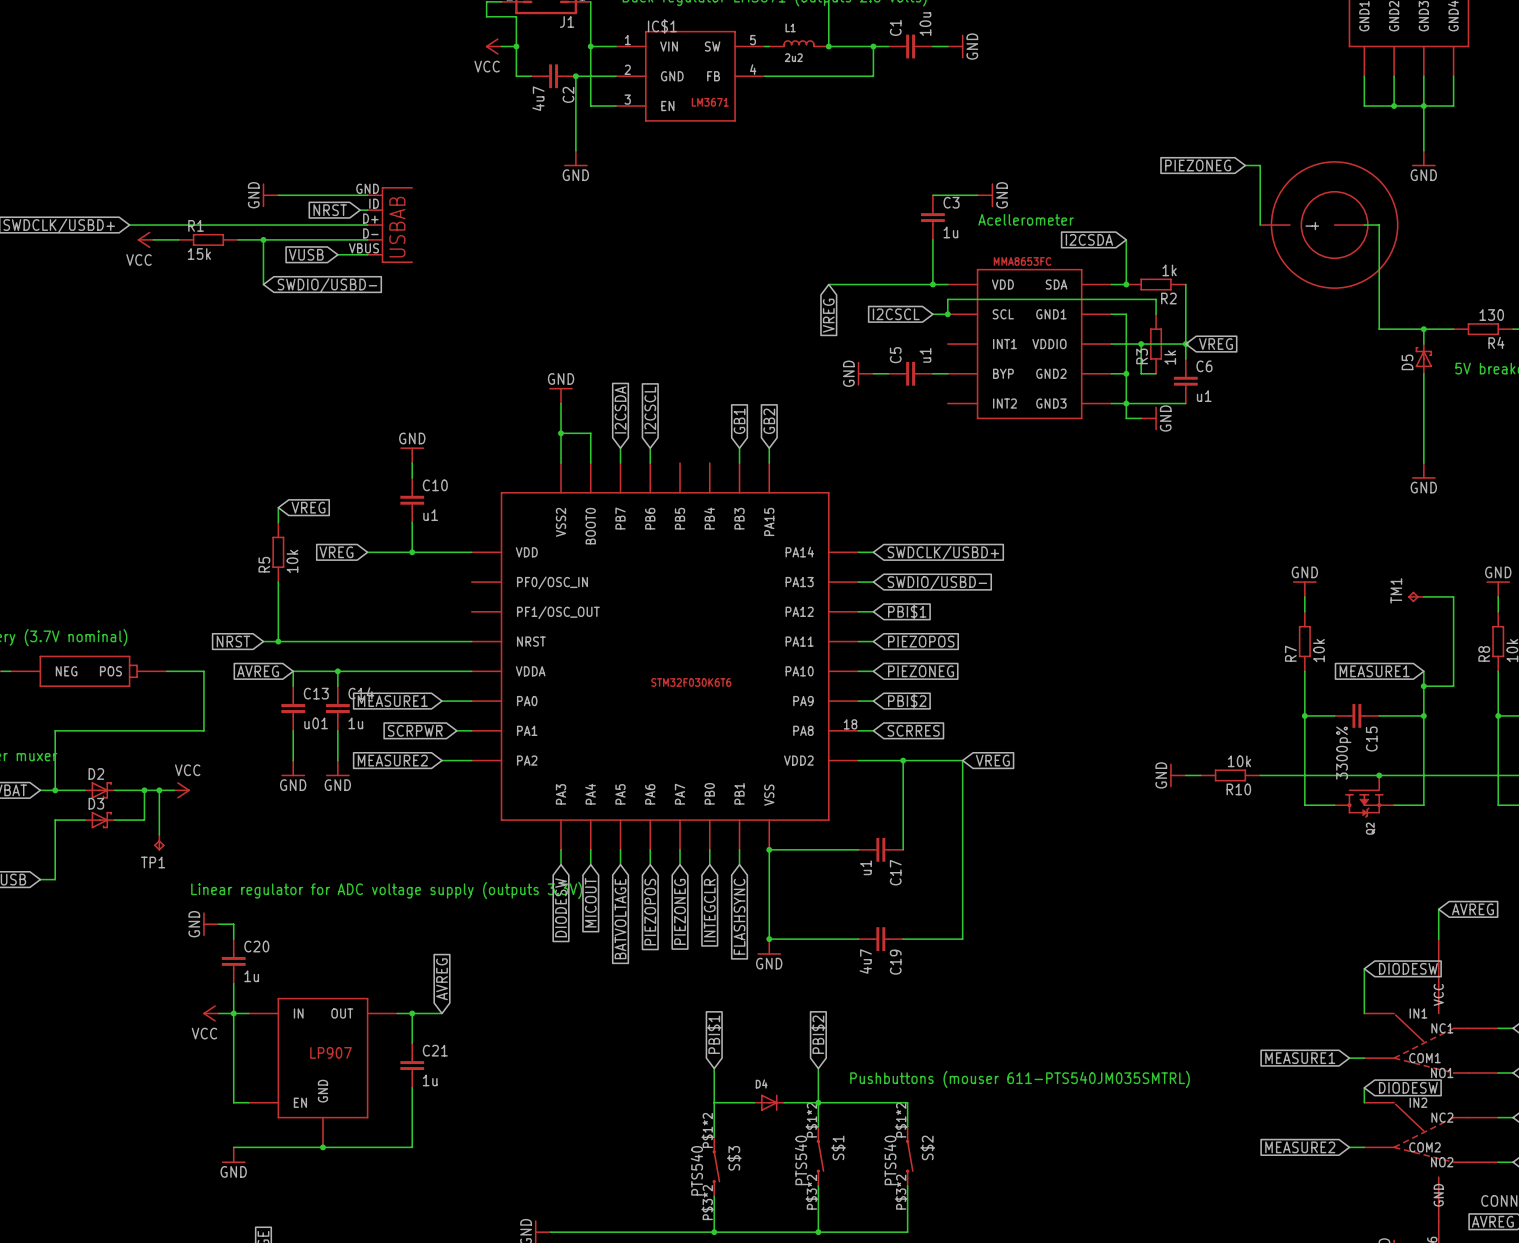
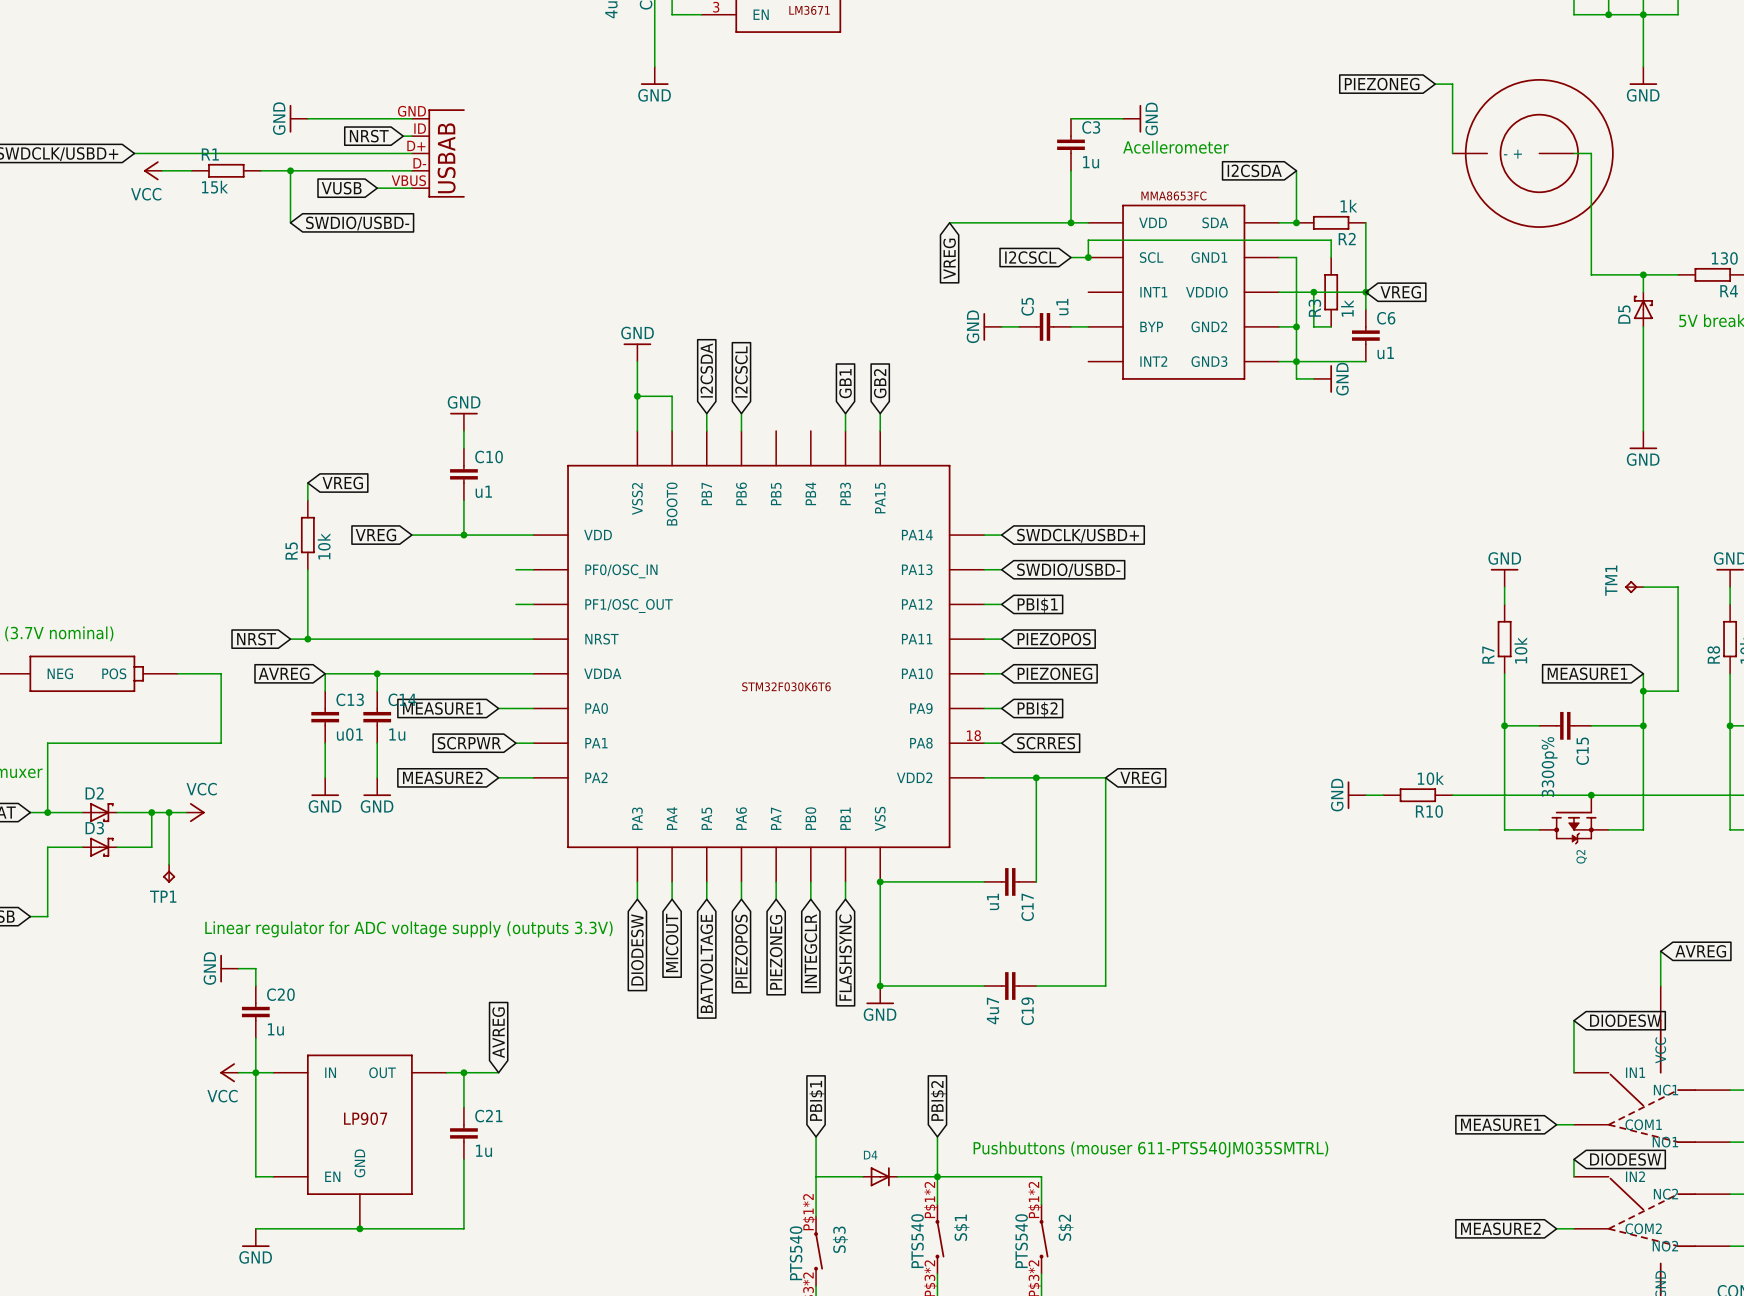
wire: none -> (515, 569) (533, 569)
wire: none -> (515, 604) (533, 604)

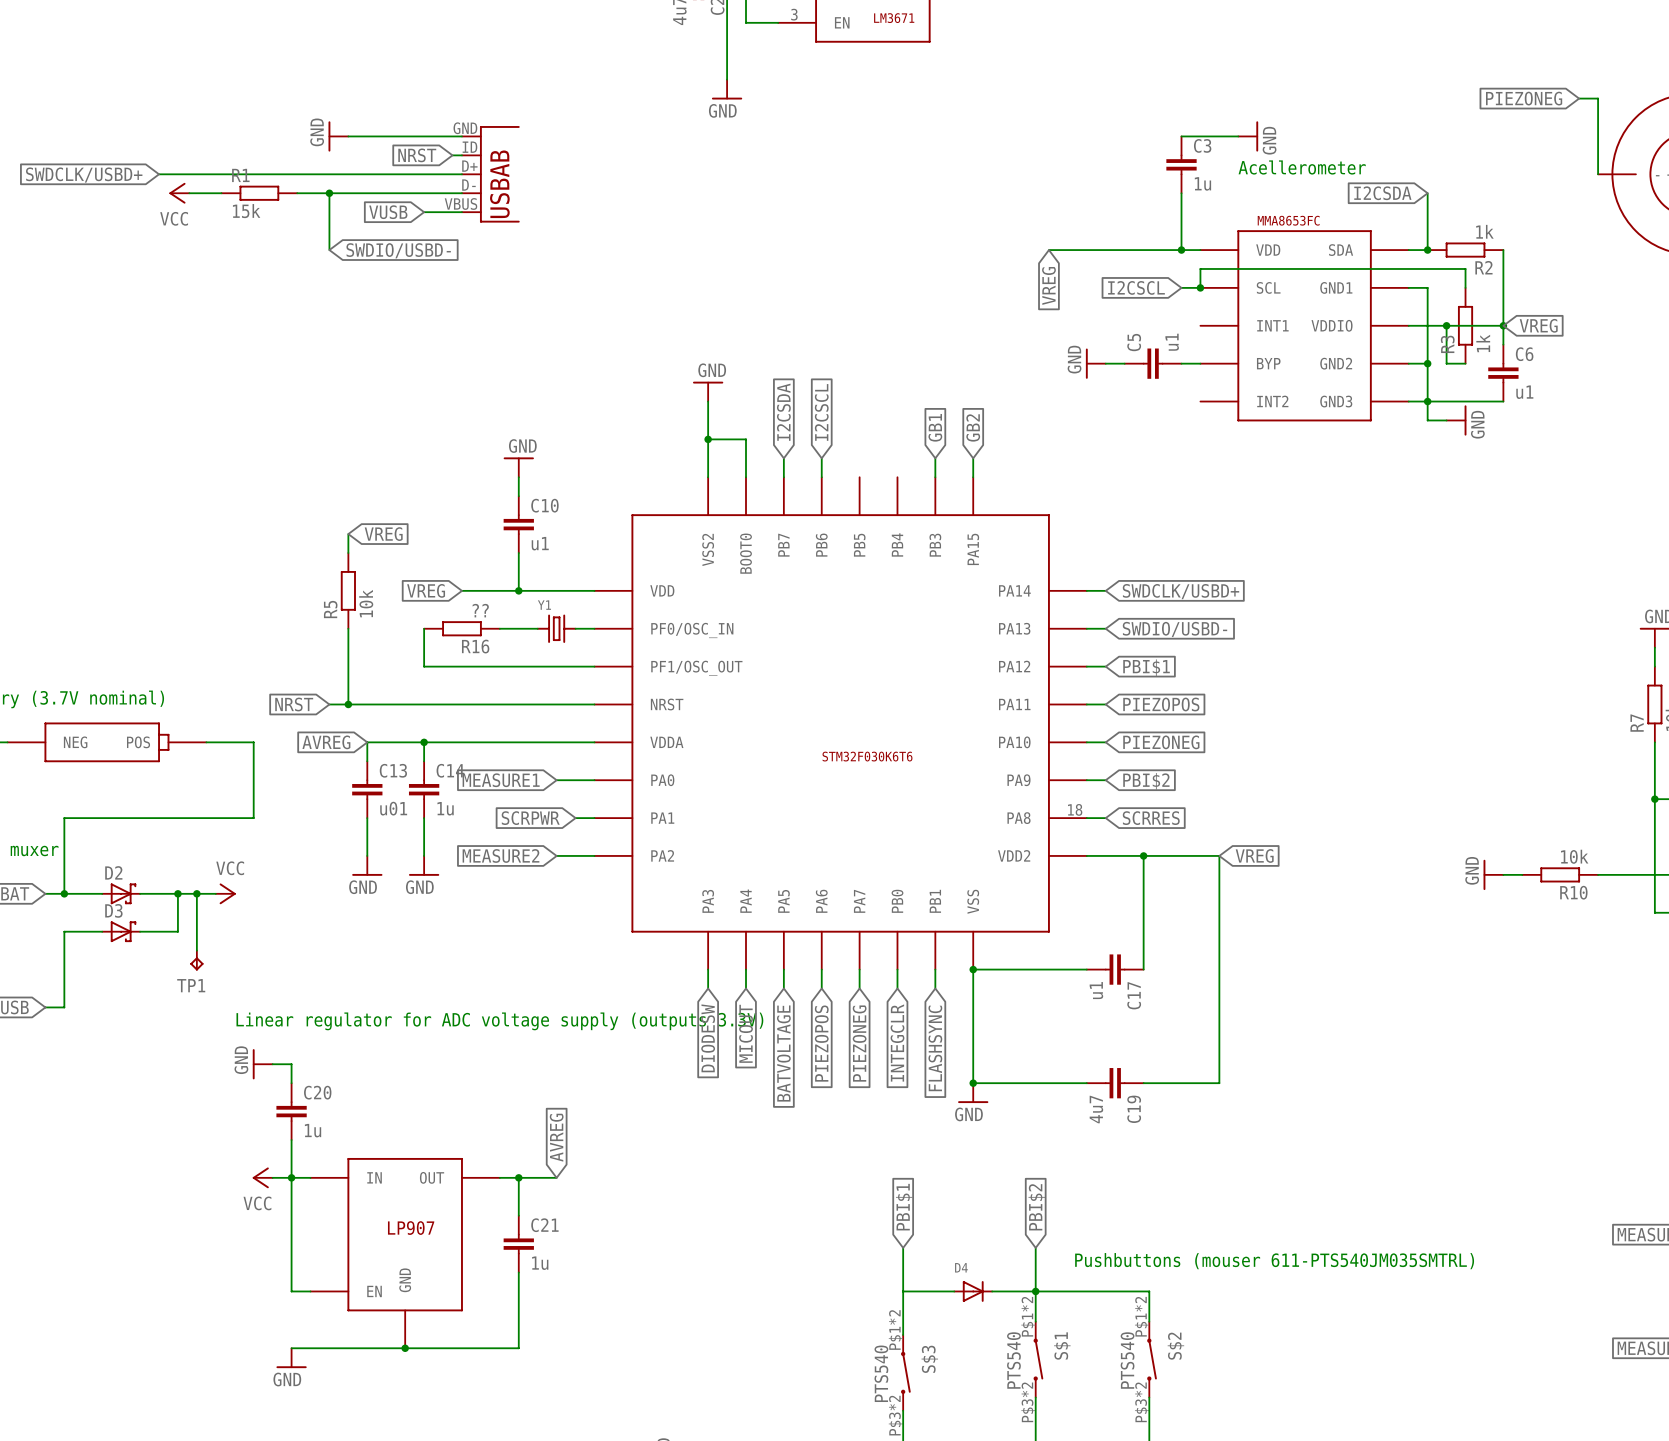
wire: none -> (424, 628) (424, 666) (575, 666)
R16: none -> ?? (461, 628)
wire: none -> (499, 628) (537, 628)
Y1: none -> (556, 628)

